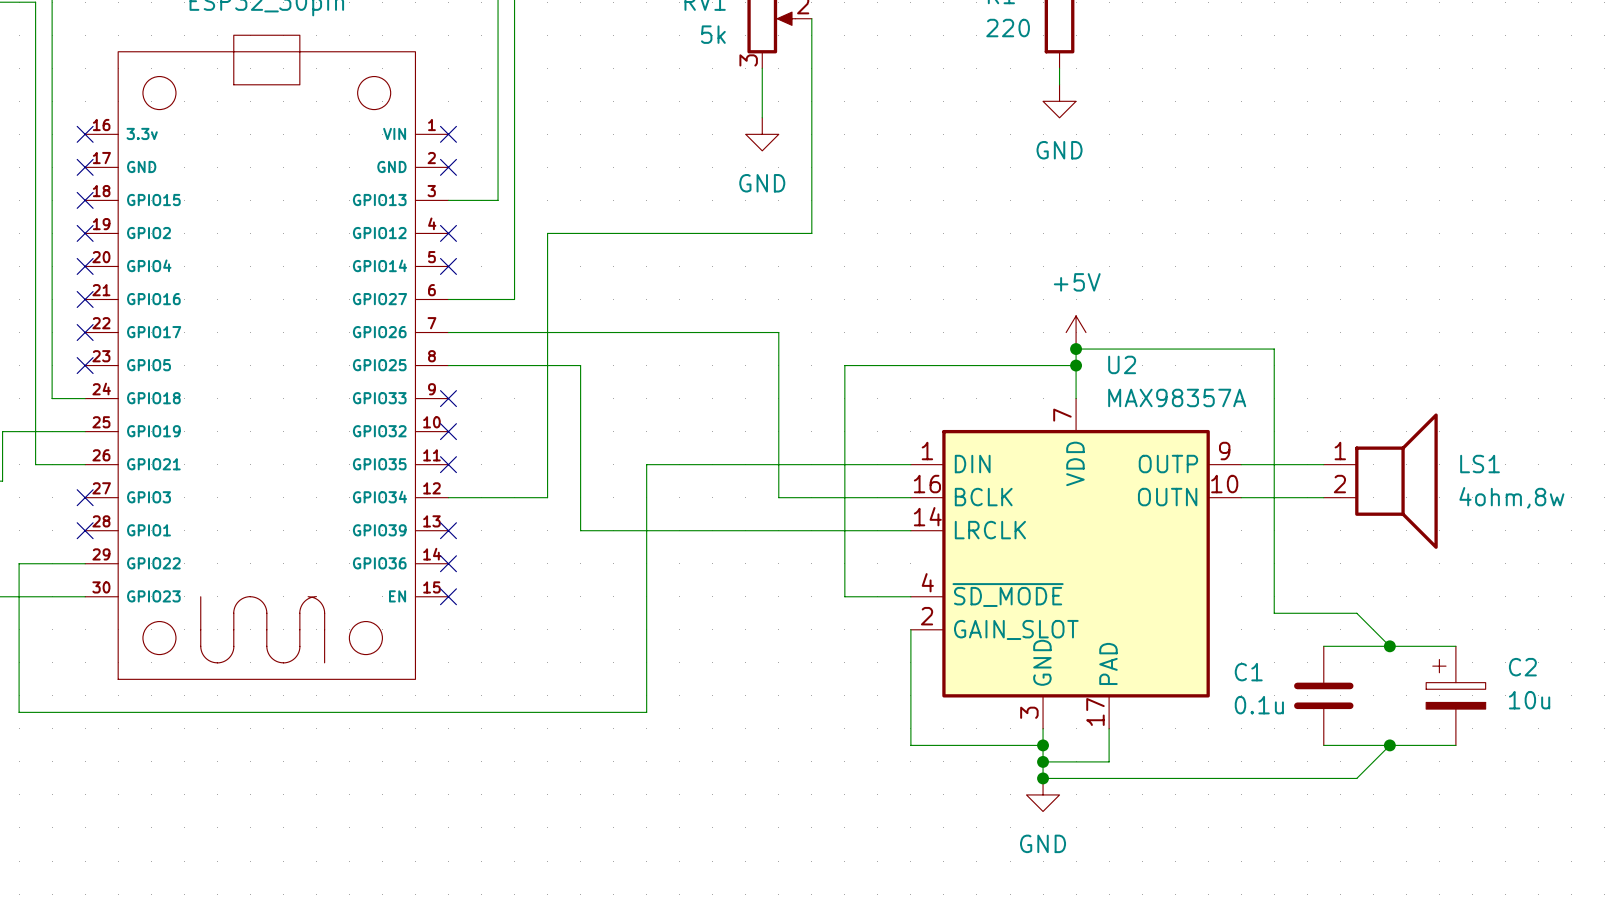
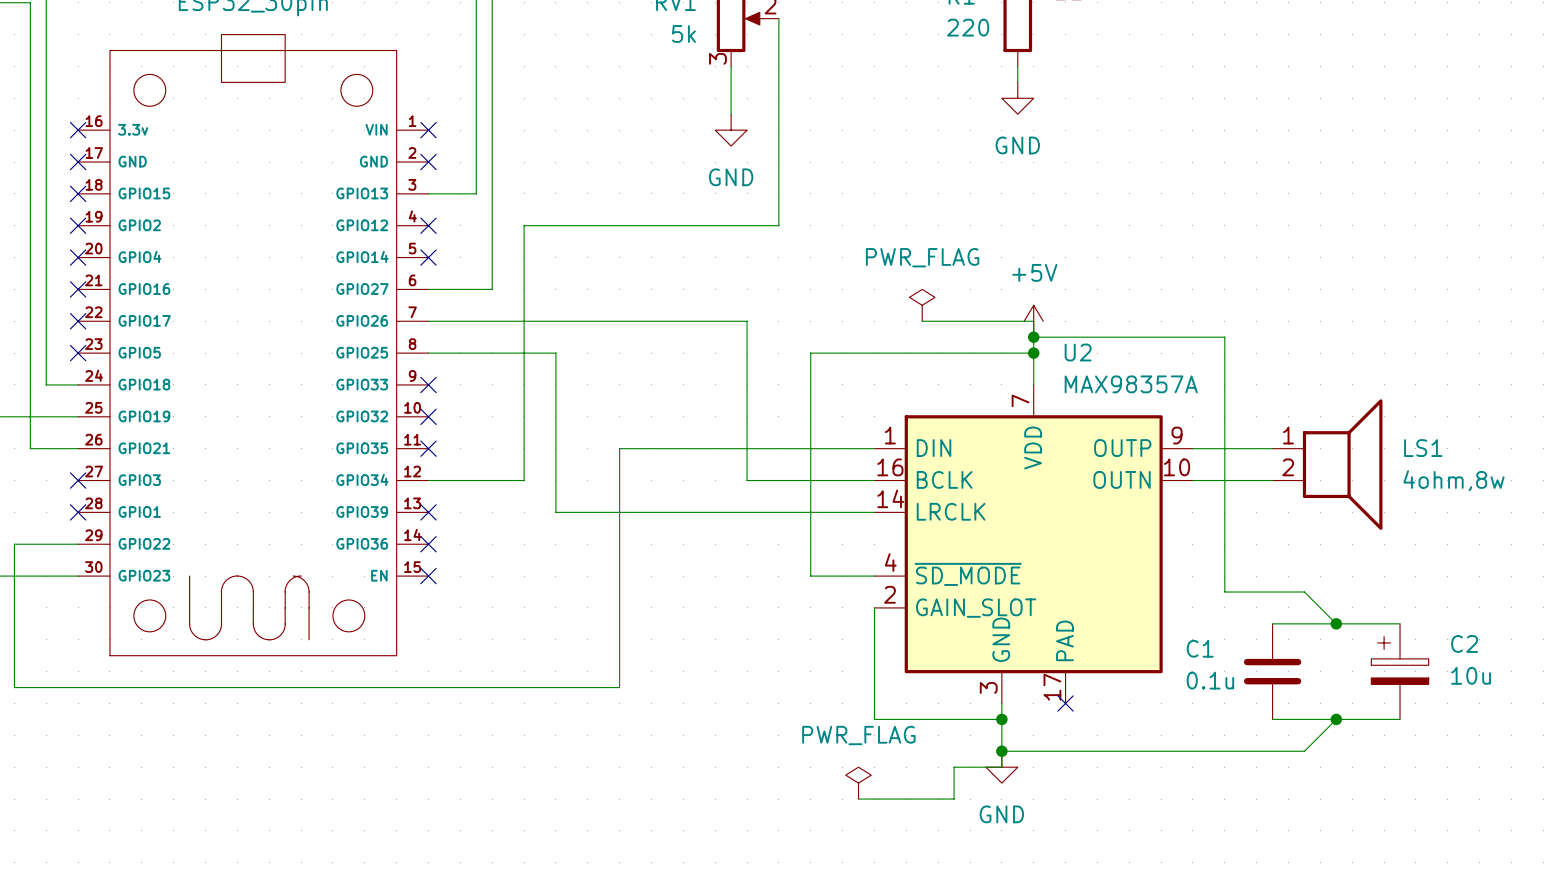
power symbol: none -> PWR_FLAG (922, 305)
wire: none -> (922, 321) (1033, 321) (1033, 337)
wire: (1109, 728) (1109, 761) (1043, 761) -> none
no-connect mark: none -> (1065, 703)
junction: (1043, 761) -> none
wire: none -> (1001, 751) (1001, 767) (954, 767) (954, 799) (858, 799)
power symbol: none -> PWR_FLAG (858, 783)

